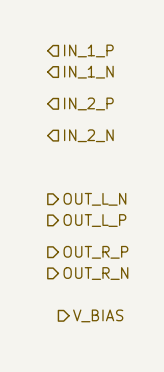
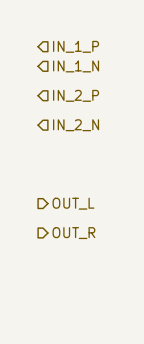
hierarchical label: OUT_L_N (94, 199) -> none
hierarchical label: OUT_L_P (94, 220) -> OUT_L (73, 203)
hierarchical label: OUT_R_P (95, 252) -> OUT_R (73, 233)
hierarchical label: OUT_R_N (95, 273) -> none
hierarchical label: V_BIAS (98, 315) -> none

